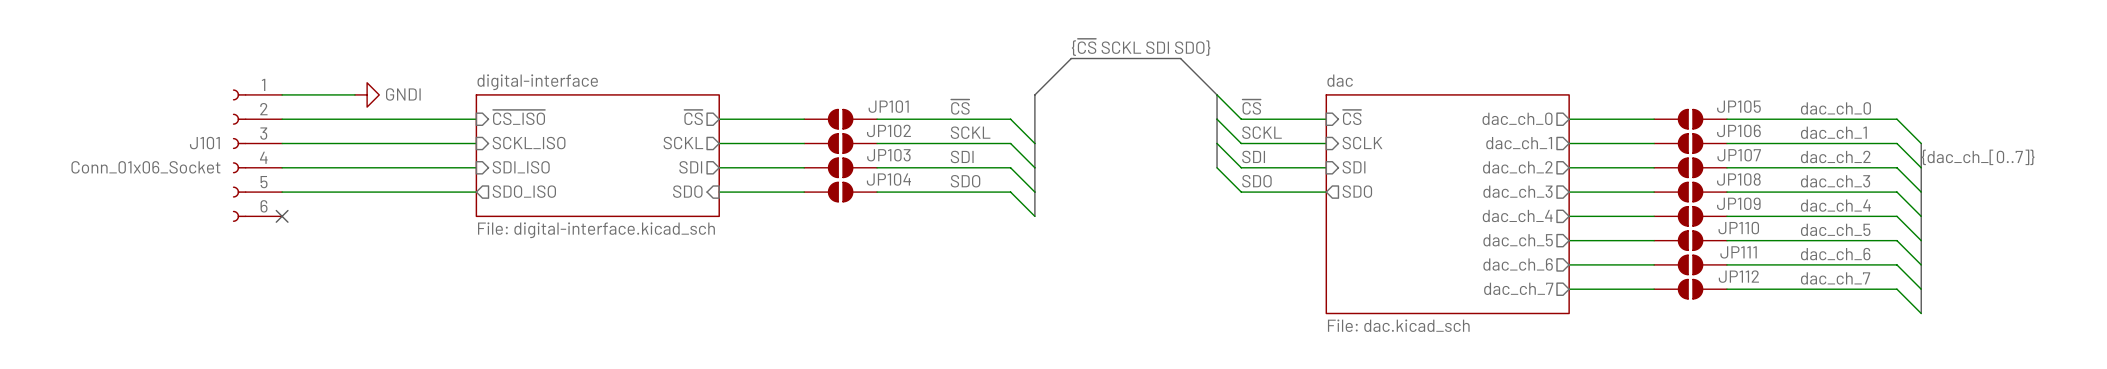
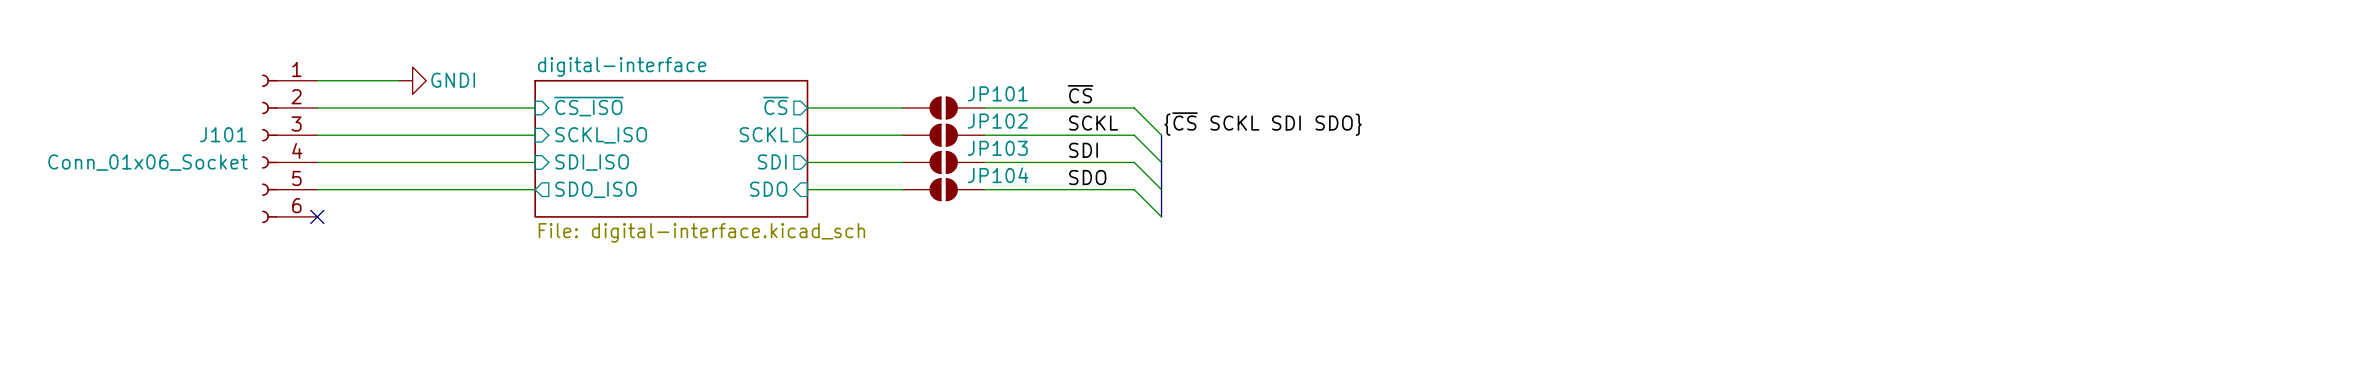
label position: {~{CS} SCKL SDI SDO} (1141, 47) -> {~{CS} SCKL SDI SDO} (1263, 124)
wire: (1217, 94) (1241, 119) (1326, 119) -> none
label: ~{CS} (1251, 107) -> none
label: dac_ch_0 (1835, 108) -> none
sheet pin: ~{CS} (1352, 117) -> none
sheet pin: dac_ch_0 (1517, 118) -> none
wire: (1217, 119) (1241, 143) (1326, 143) -> none
wire: (1569, 119) (1654, 119) -> none
JP105: (1690, 119) -> none
wire: (1726, 119) (1896, 119) (1921, 143) -> none
label: SCKL (1262, 132) -> none
label: dac_ch_1 (1833, 132) -> none
bus: (1034, 143) (1034, 94) (1071, 58) (1180, 58) (1217, 94) (1217, 167) -> none
wire: (1217, 143) (1241, 167) (1326, 167) -> none
sheet pin: SCLK (1362, 143) -> none
sheet pin: dac_ch_1 (1519, 143) -> none
wire: (1569, 143) (1654, 143) -> none
JP106: (1690, 143) -> none
wire: (1726, 143) (1896, 143) (1921, 167) -> none
bus: (1921, 143) (1921, 313) -> none
label: SDI (1253, 156) -> none
label: dac_ch_2 (1835, 156) -> none
label: {dac_ch_[0..7]} (1978, 157) -> none
wire: (1217, 167) (1241, 192) (1326, 192) -> none
sheet pin: SDI (1354, 167) -> none
sheet pin: dac_ch_2 (1517, 167) -> none
wire: (1569, 167) (1654, 167) -> none
JP107: (1690, 167) -> none
wire: (1726, 167) (1896, 167) (1921, 192) -> none
label: SDO (1256, 181) -> none
label: dac_ch_3 (1835, 181) -> none
sheet pin: SDO (1357, 191) -> none
sheet pin: dac_ch_3 (1517, 191) -> none
wire: (1569, 192) (1654, 192) -> none
JP108: (1690, 192) -> none
wire: (1726, 192) (1896, 192) (1921, 216) -> none
sheet dac: File: dac.kicad_sch (1447, 204) -> none
label: dac_ch_4 (1835, 205) -> none
sheet pin: dac_ch_4 (1517, 215) -> none
wire: (1569, 216) (1654, 216) -> none
JP109: (1690, 216) -> none
wire: (1726, 216) (1896, 216) (1921, 240) -> none
label: dac_ch_5 (1835, 229) -> none
sheet pin: dac_ch_5 (1518, 240) -> none
wire: (1569, 240) (1654, 240) -> none
JP110: (1690, 240) -> none
wire: (1726, 240) (1896, 240) (1921, 264) -> none
label: dac_ch_6 (1835, 254) -> none
sheet pin: dac_ch_6 (1518, 264) -> none
wire: (1569, 264) (1654, 264) -> none
JP111: (1690, 264) -> none
wire: (1726, 264) (1896, 264) (1921, 289) -> none
label: dac_ch_7 (1835, 278) -> none
sheet pin: dac_ch_7 (1518, 288) -> none
wire: (1569, 289) (1654, 289) -> none
JP112: (1690, 289) -> none
wire: (1726, 289) (1896, 289) (1921, 313) -> none

